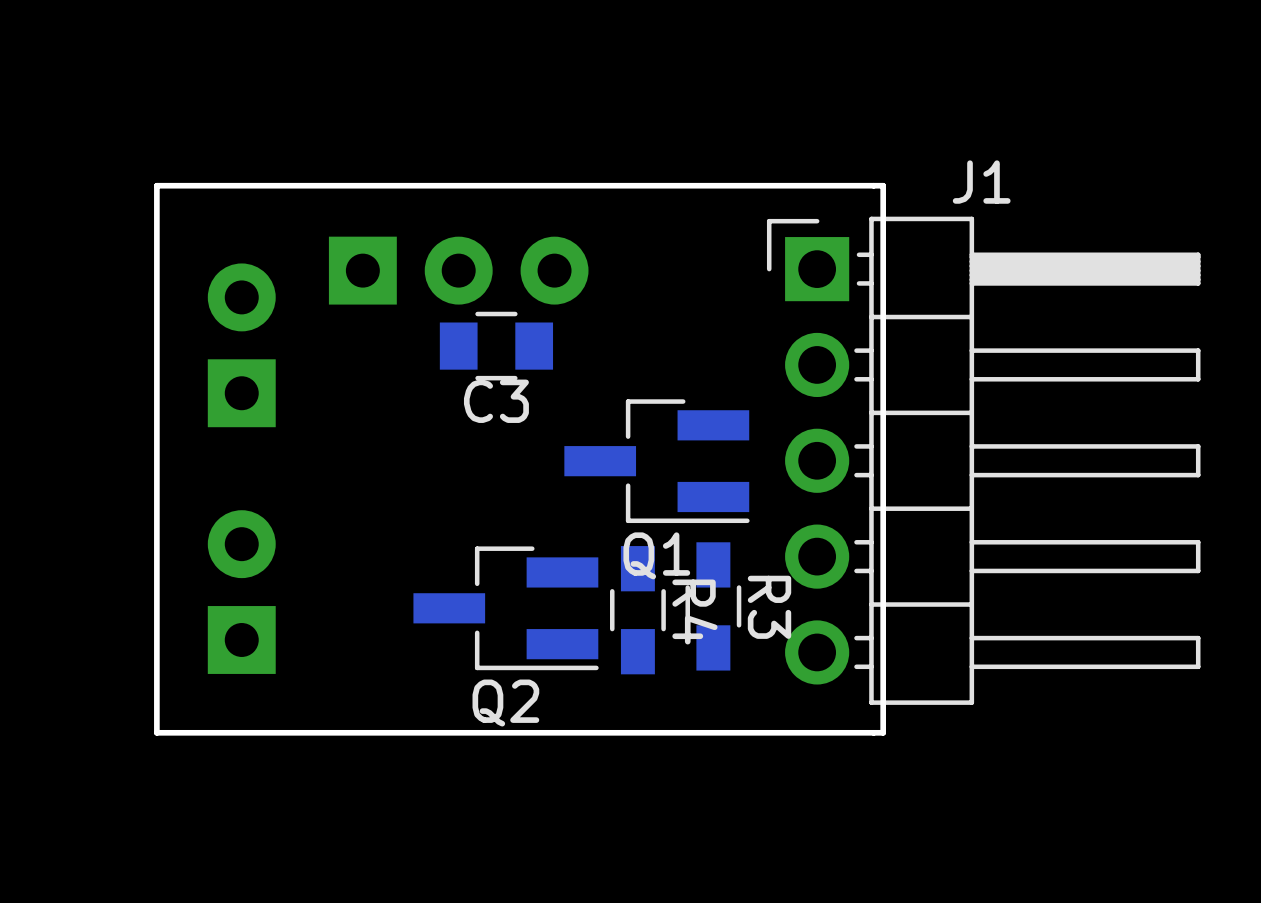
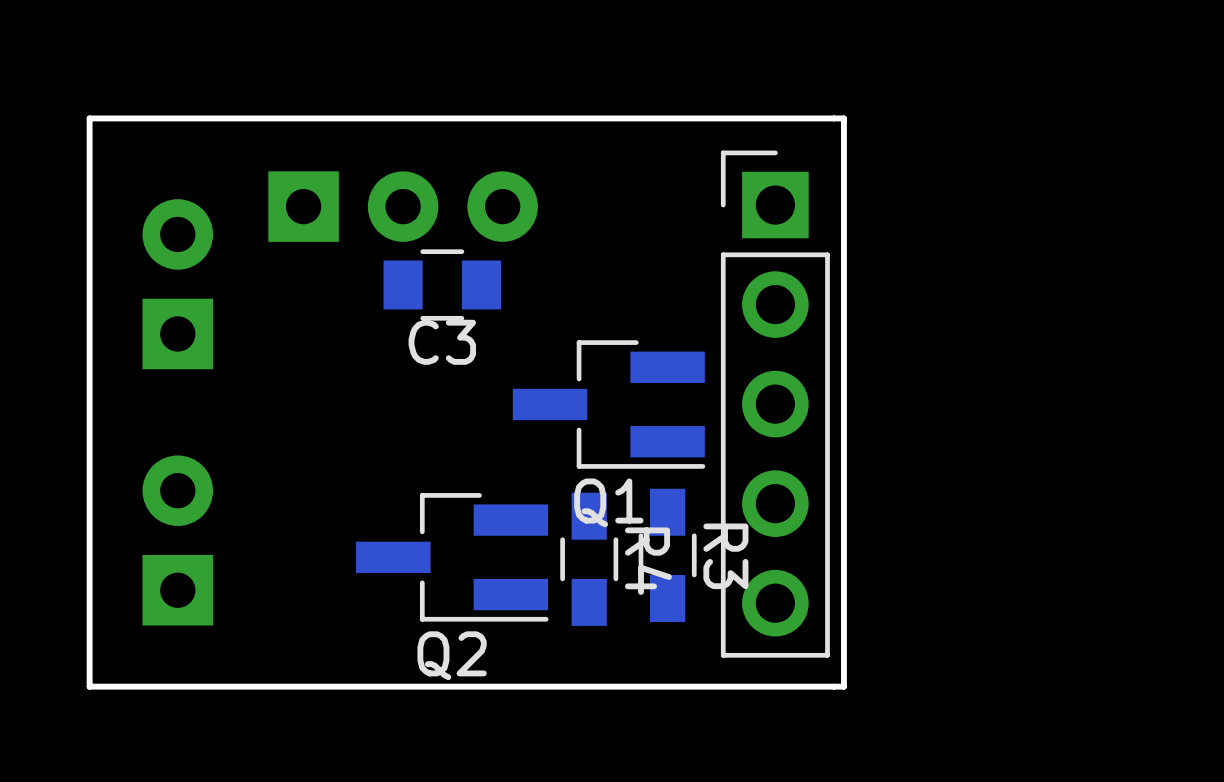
part: none -> (775, 404)
J1: (983, 460) -> none

